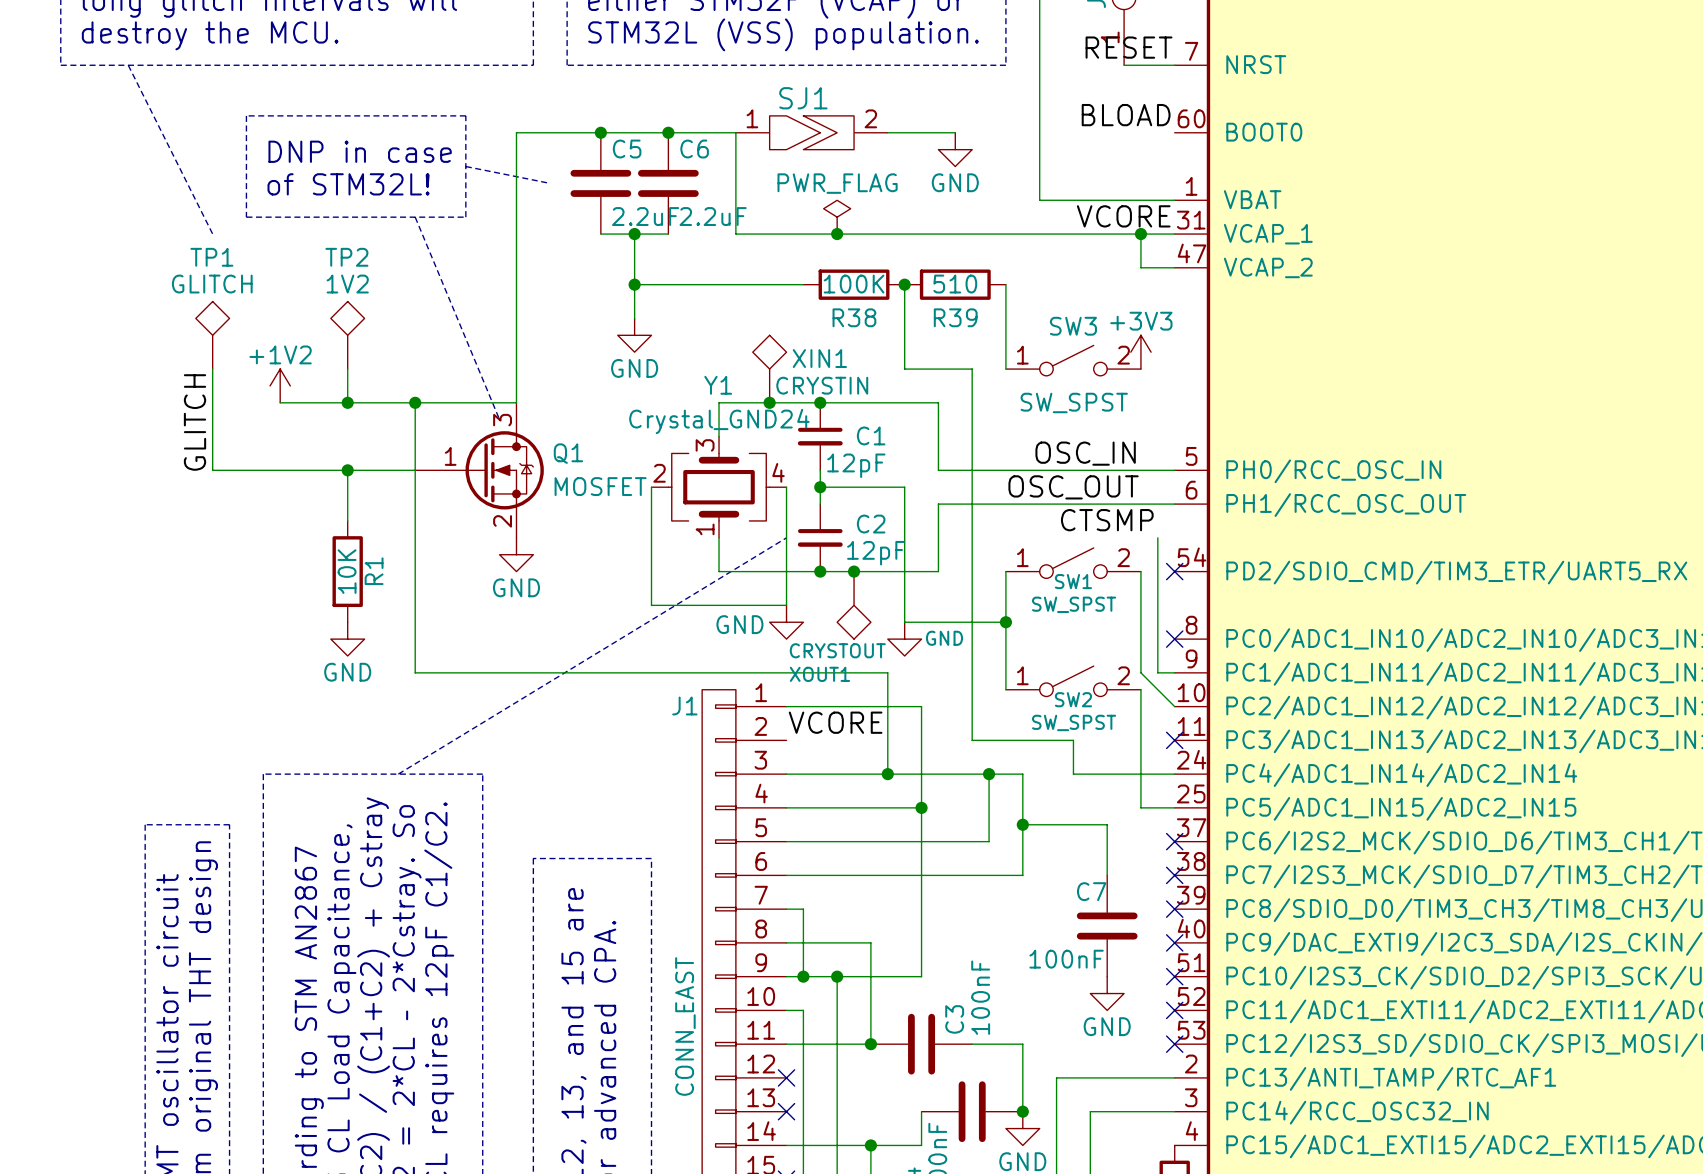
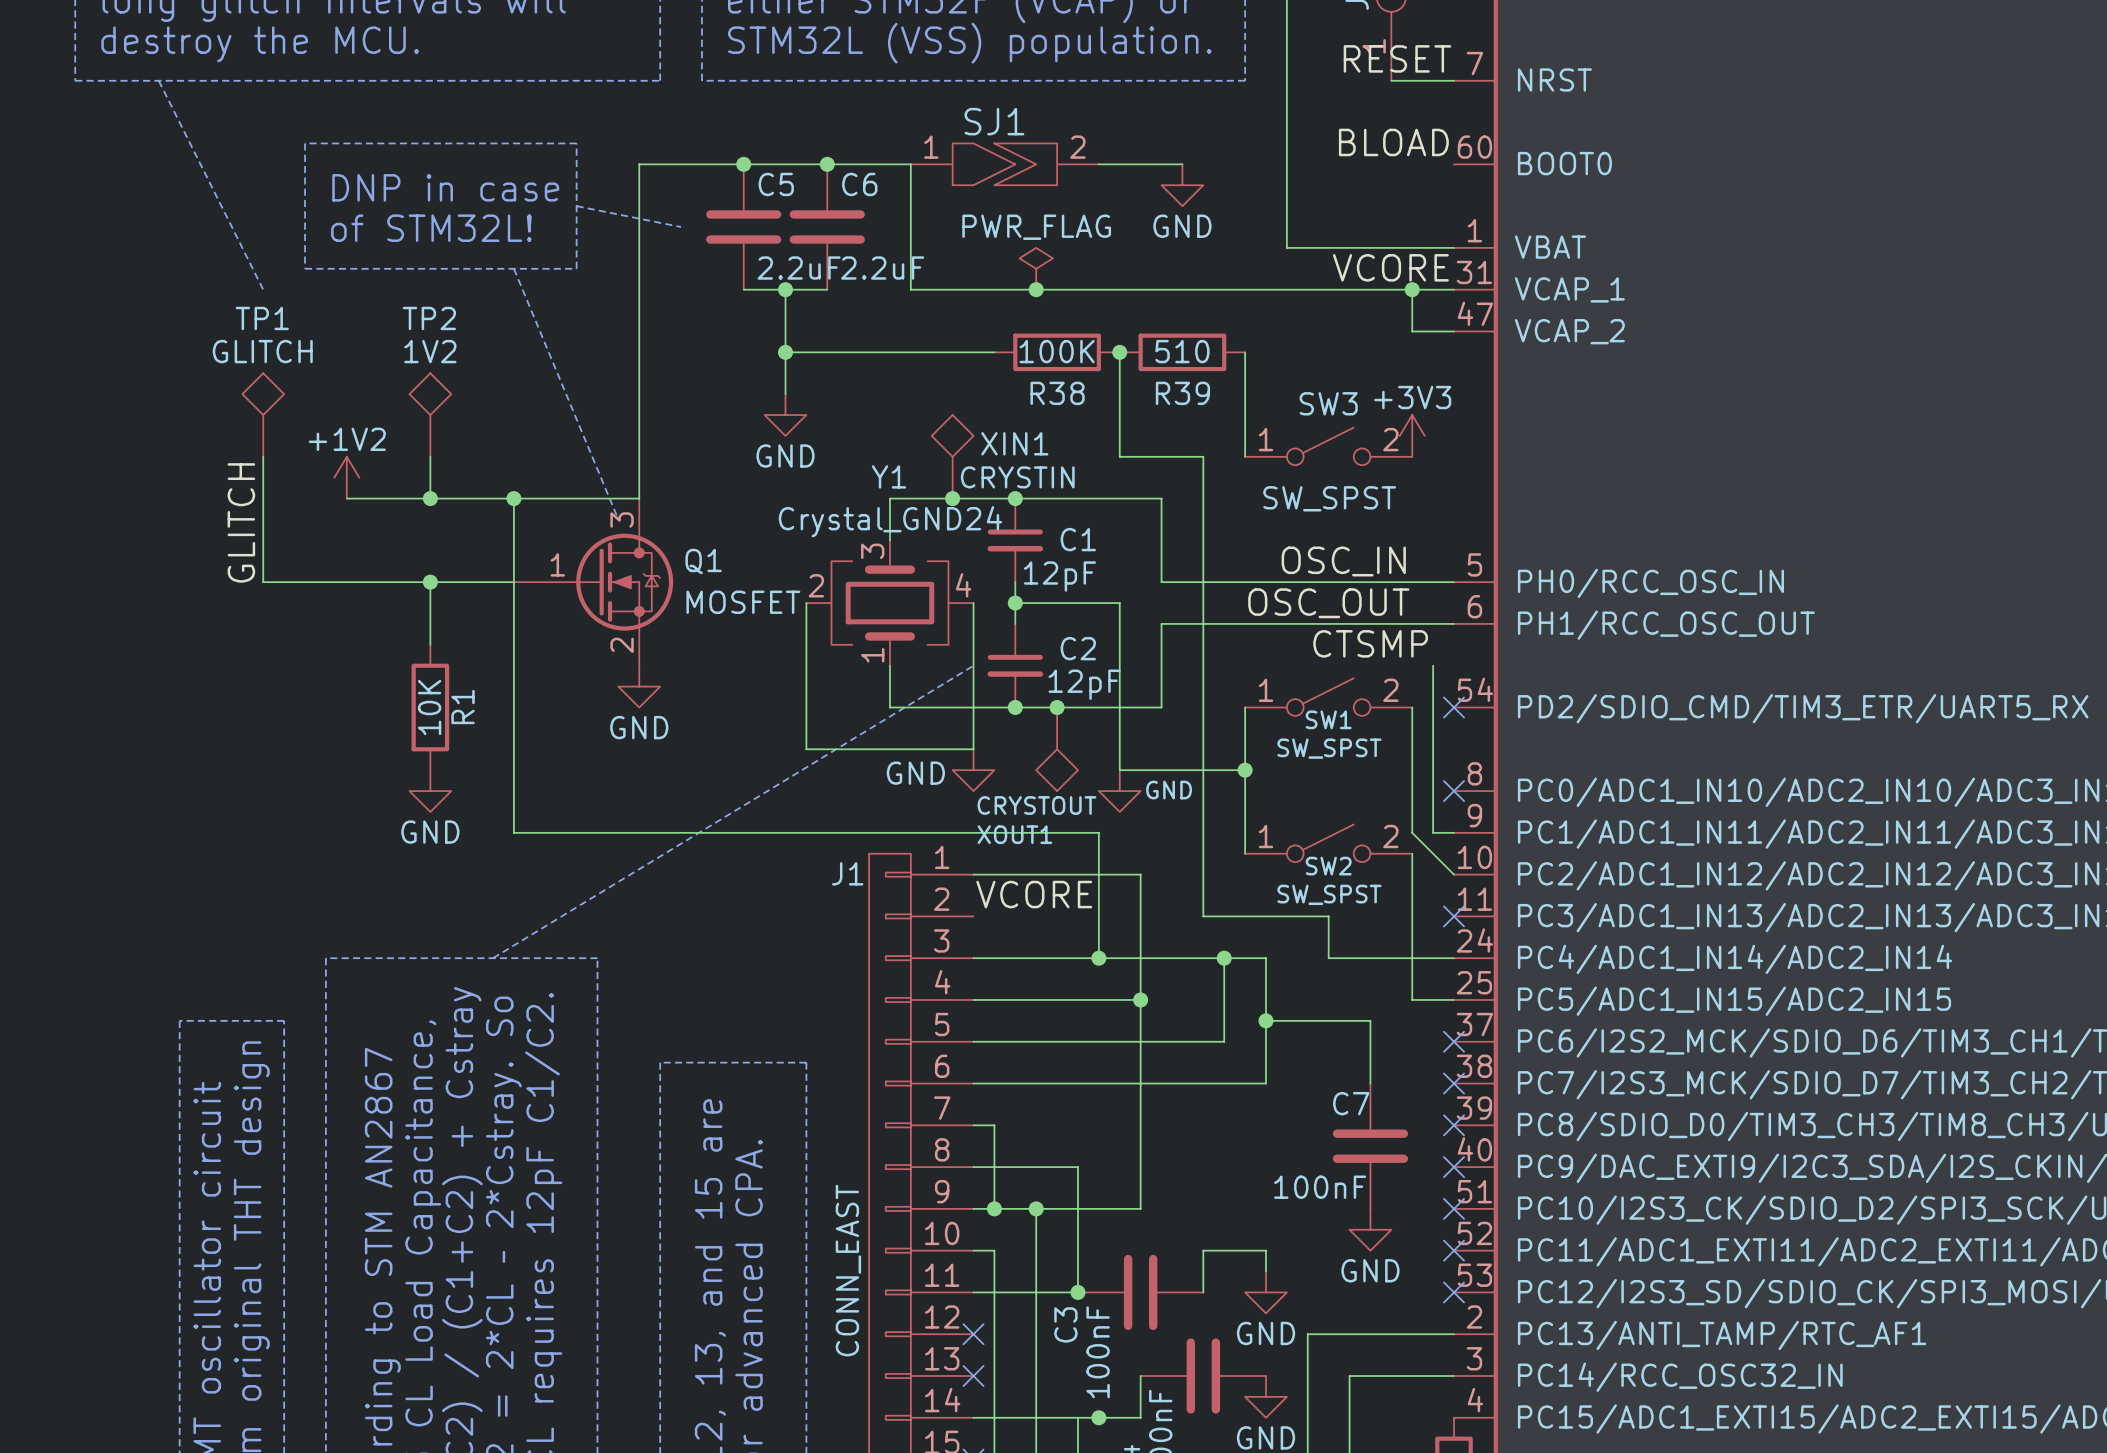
C3 value position: 100nF (980, 997) -> 100nF (1098, 1352)
C3 name position: C3 (954, 1019) -> C3 (1065, 1324)
wire: (972, 1044) (1022, 1044) (1022, 1111) -> (1203, 1292) (1203, 1250) (1266, 1250) (1266, 1271)
power symbol: none -> GND (1266, 1292)
junction: (1022, 1111) -> none
junction position: (870, 1145) -> (1098, 1417)

